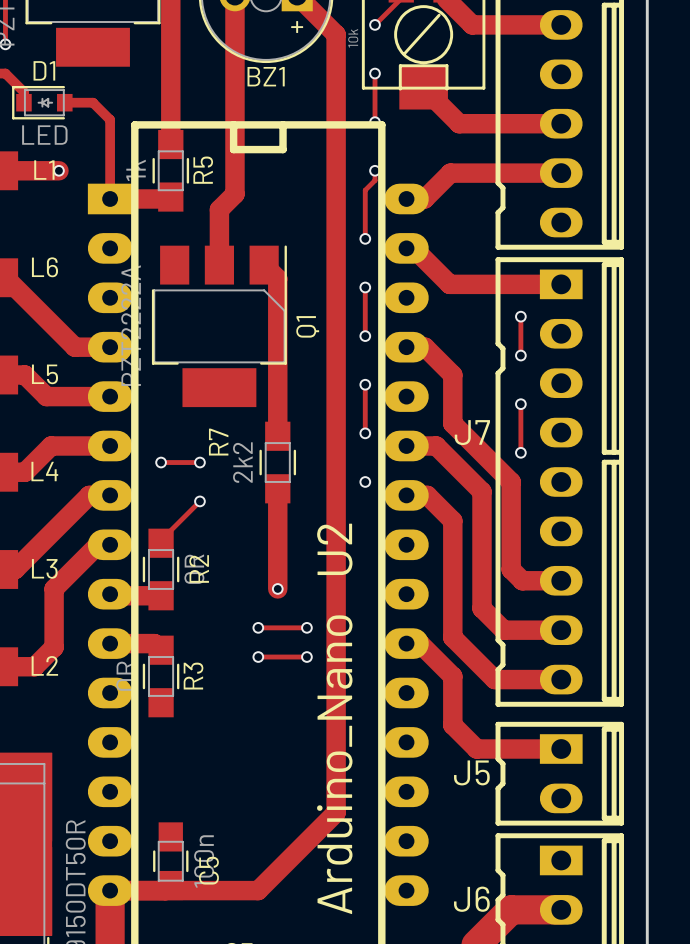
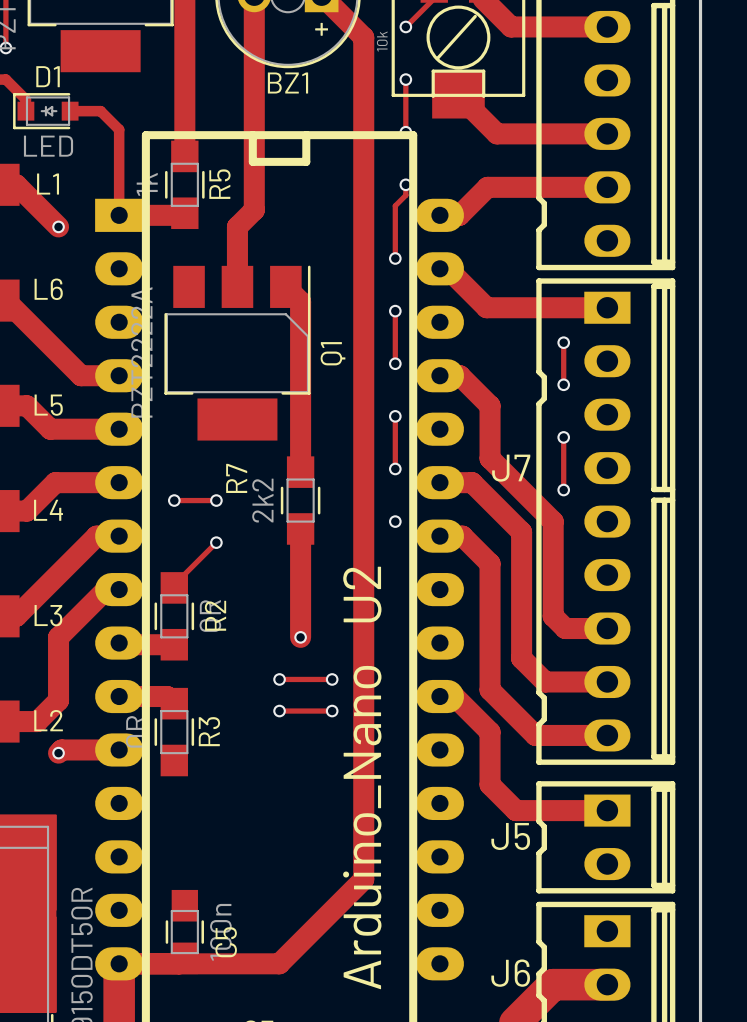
track: (15, 170) (58, 170) -> (16, 184) (58, 226)
via position: (58, 170) -> (58, 226)
track: none -> (119, 749) (61, 749) (58, 753)
via: none -> (58, 753)

